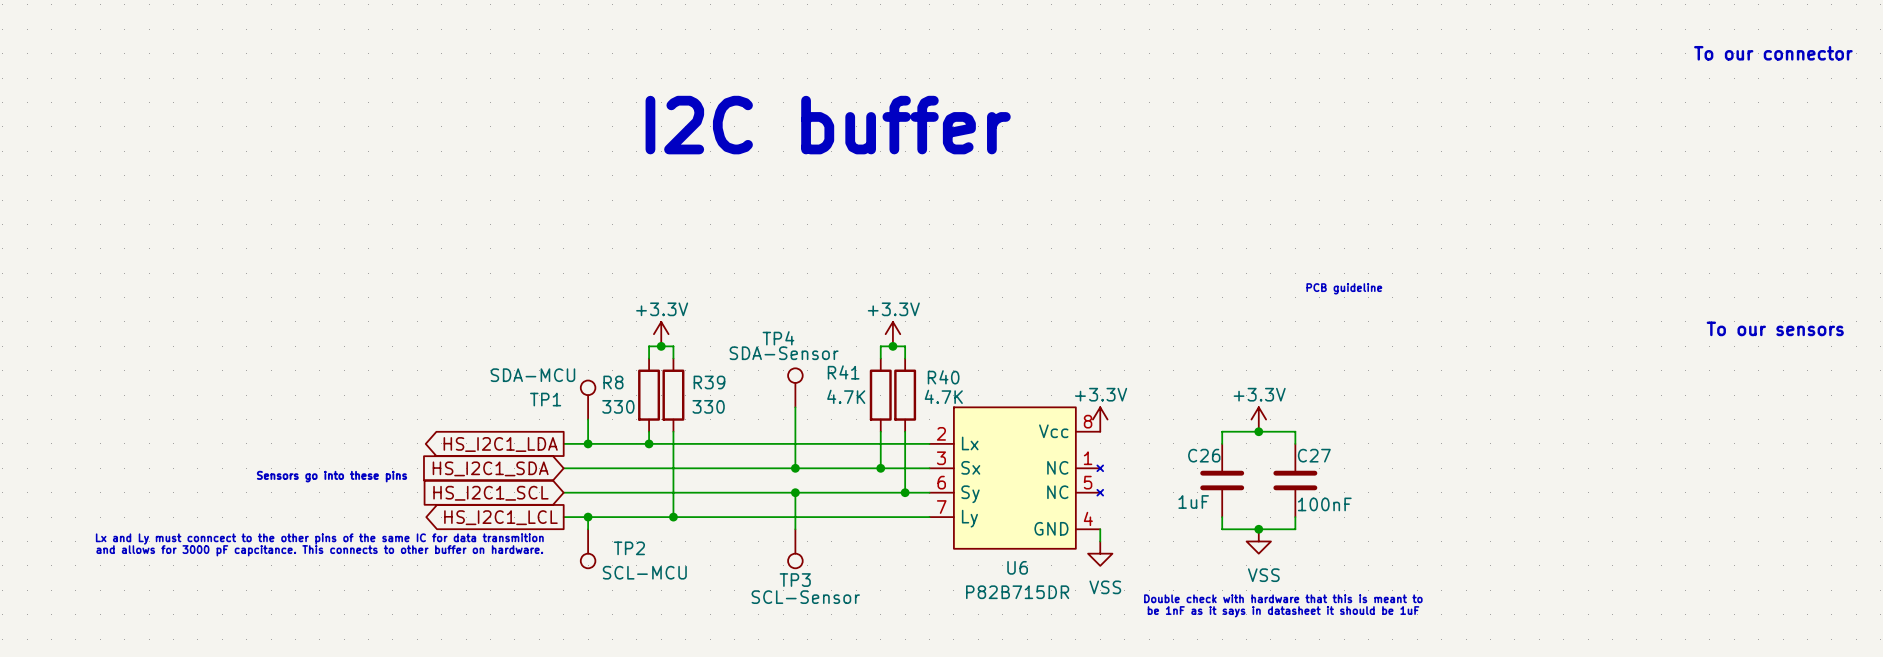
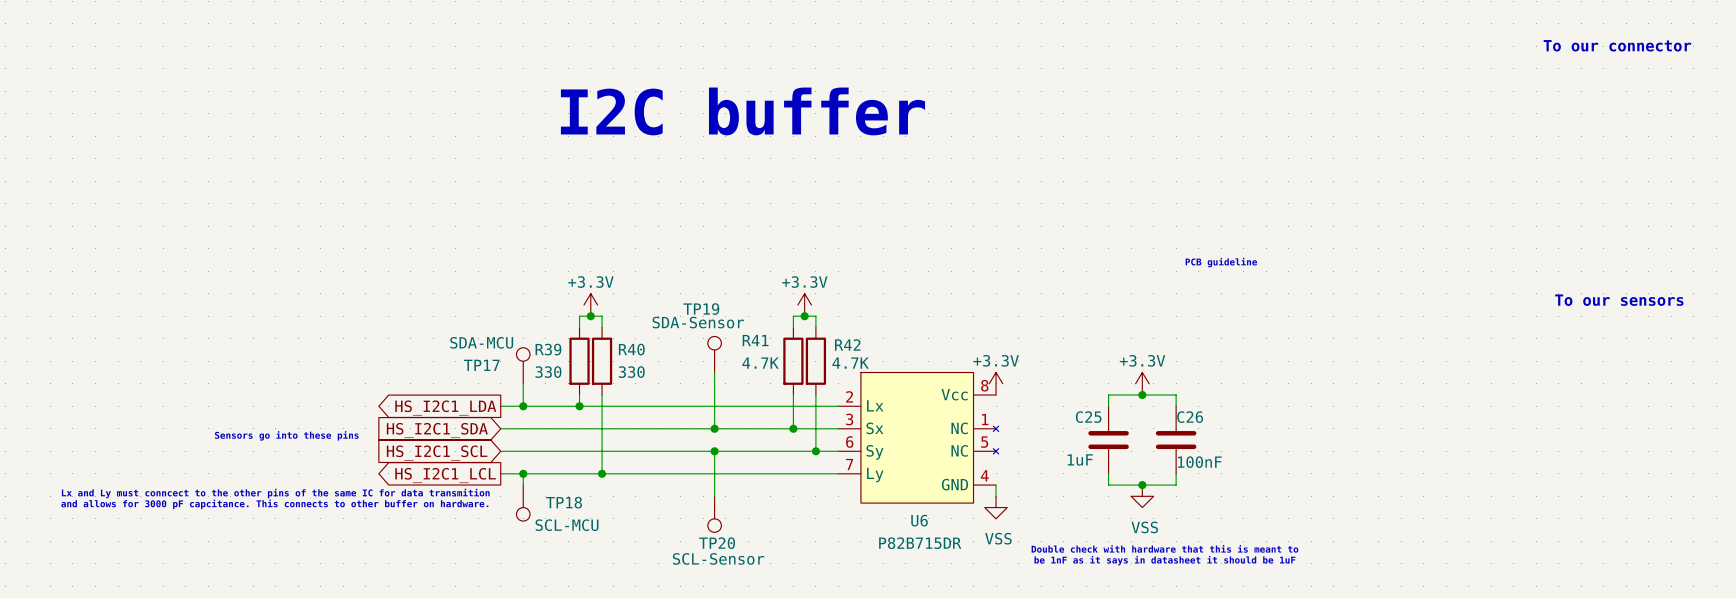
TP4 name: TP4 (778, 338) -> TP19 (701, 309)
R40 name: R40 (943, 377) -> R42 (847, 344)
R8 name: R8 (613, 382) -> R39 (548, 349)
R39 name: R39 (709, 382) -> R40 (631, 349)
TP1 name: TP1 (545, 399) -> TP17 (481, 365)
C26 name: C26 (1204, 455) -> C25 (1088, 417)
C27 name: C27 (1314, 455) -> C26 (1190, 417)
TP2 name: TP2 (629, 548) -> TP18 (564, 502)
TP3: SCL-Sensor (795, 548) -> none
TP20: none -> SCL-Sensor (714, 514)

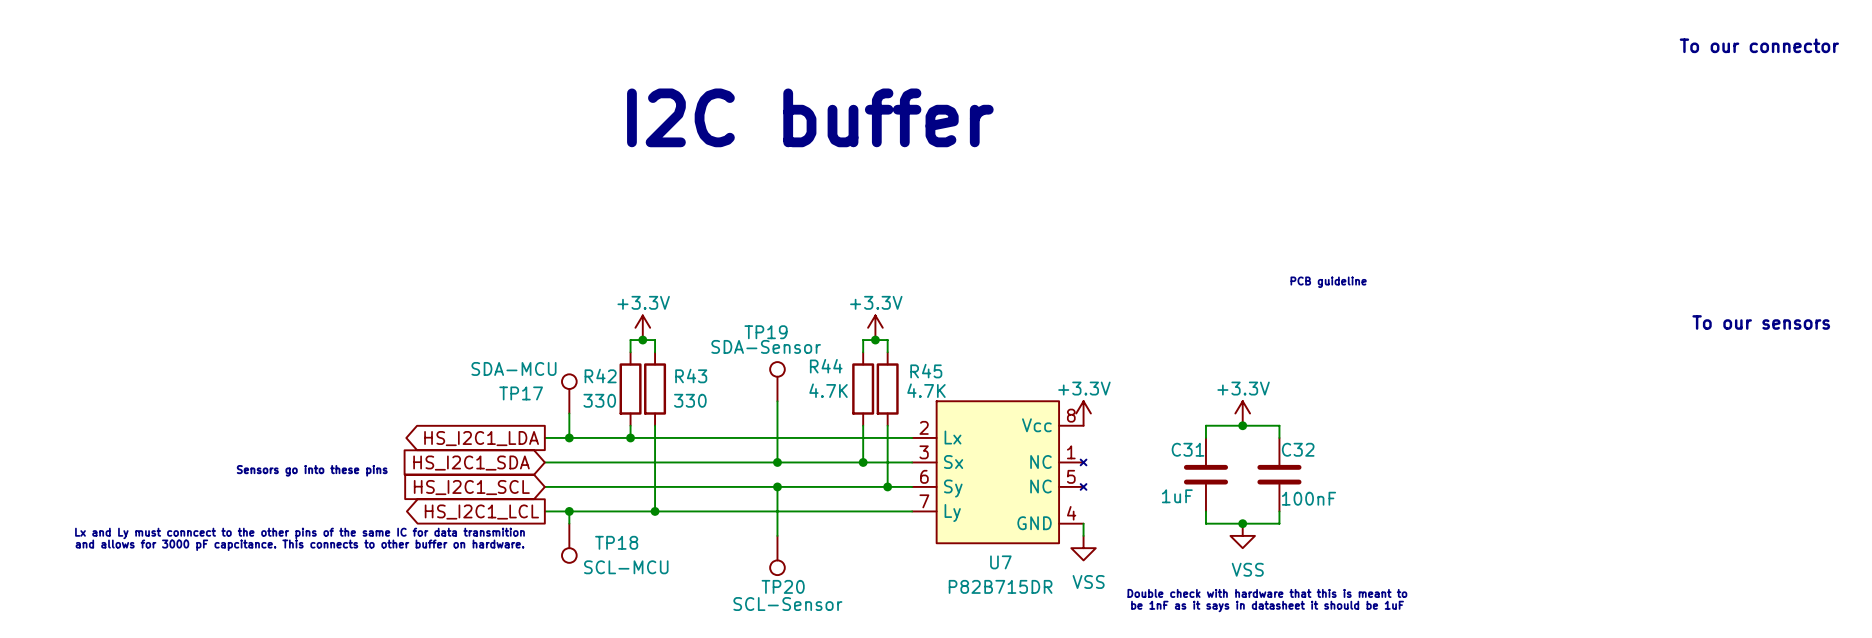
R41 name: R41 (755, 340) -> R44 (826, 366)
R42 name: R42 (847, 344) -> R45 (926, 371)
R39 name: R39 (548, 349) -> R42 (600, 376)
R40 name: R40 (631, 349) -> R43 (691, 376)
C25 name: C25 (1088, 417) -> C31 (1188, 449)
C26 name: C26 (1190, 417) -> C32 (1298, 449)
U6 name: U6 (919, 520) -> U7 (1000, 562)

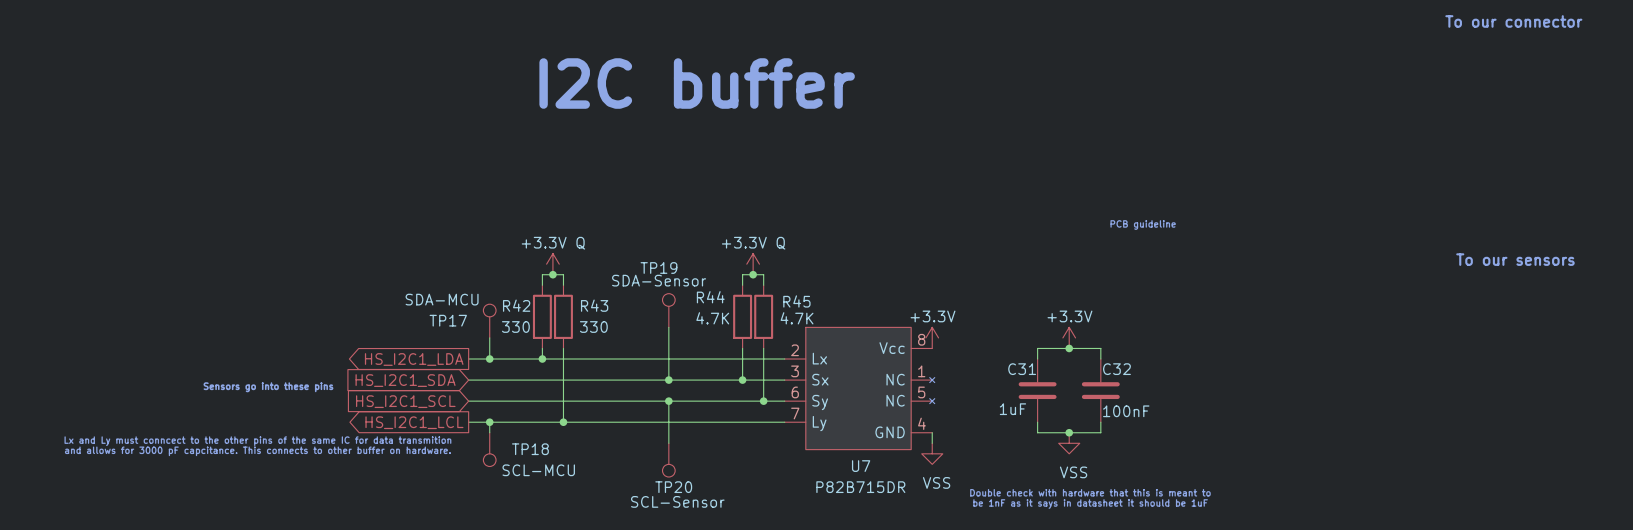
power symbol: +3.3V (642, 327) -> +3.3V Q (552, 264)
power symbol: +3.3V (875, 327) -> +3.3V Q (753, 264)

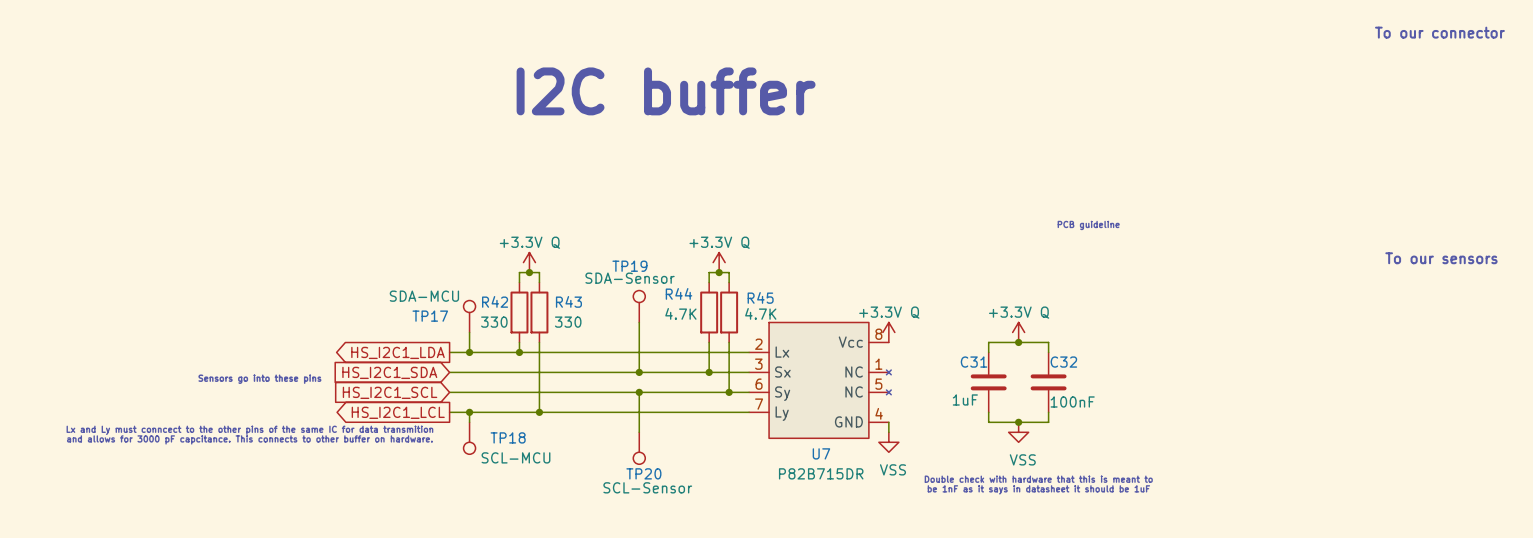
power symbol: +3.3V (932, 337) -> +3.3V Q (888, 332)
power symbol: +3.3V (1069, 337) -> +3.3V Q (1018, 332)

